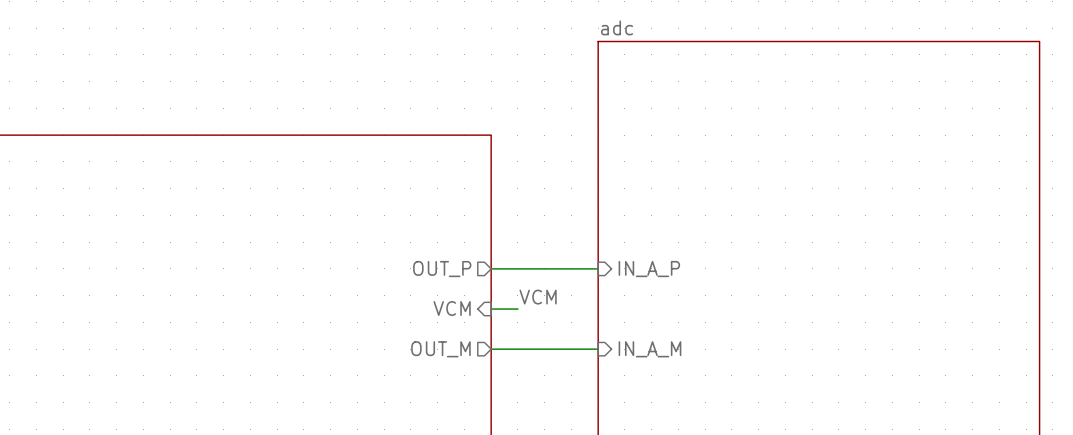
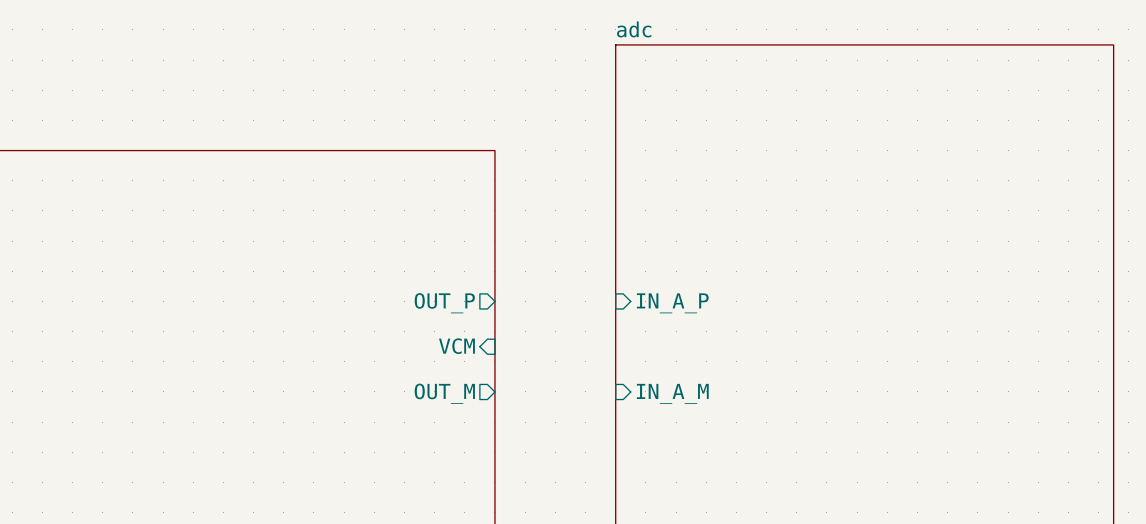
wire: (491, 268) (598, 268) -> none
label: VCM (538, 297) -> none
wire: (491, 309) (517, 309) -> none
wire: (491, 349) (598, 349) -> none

